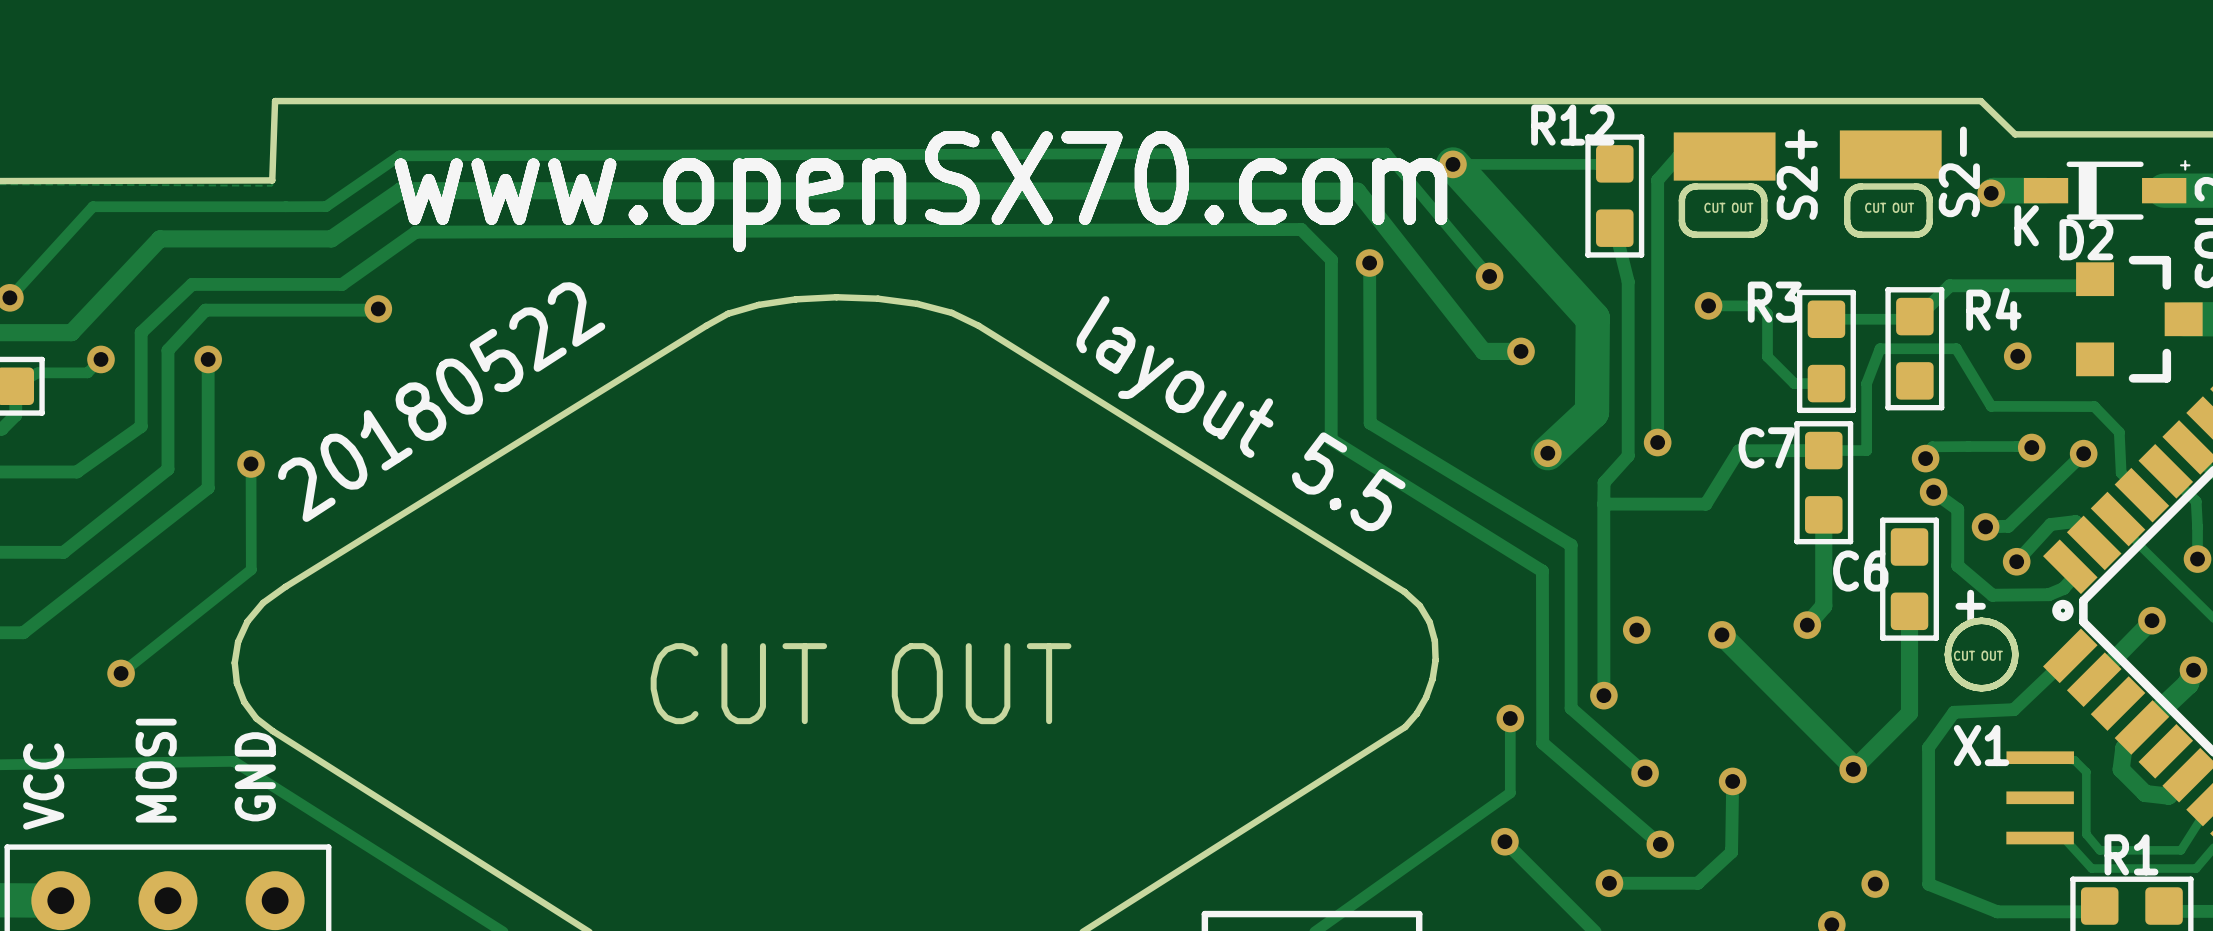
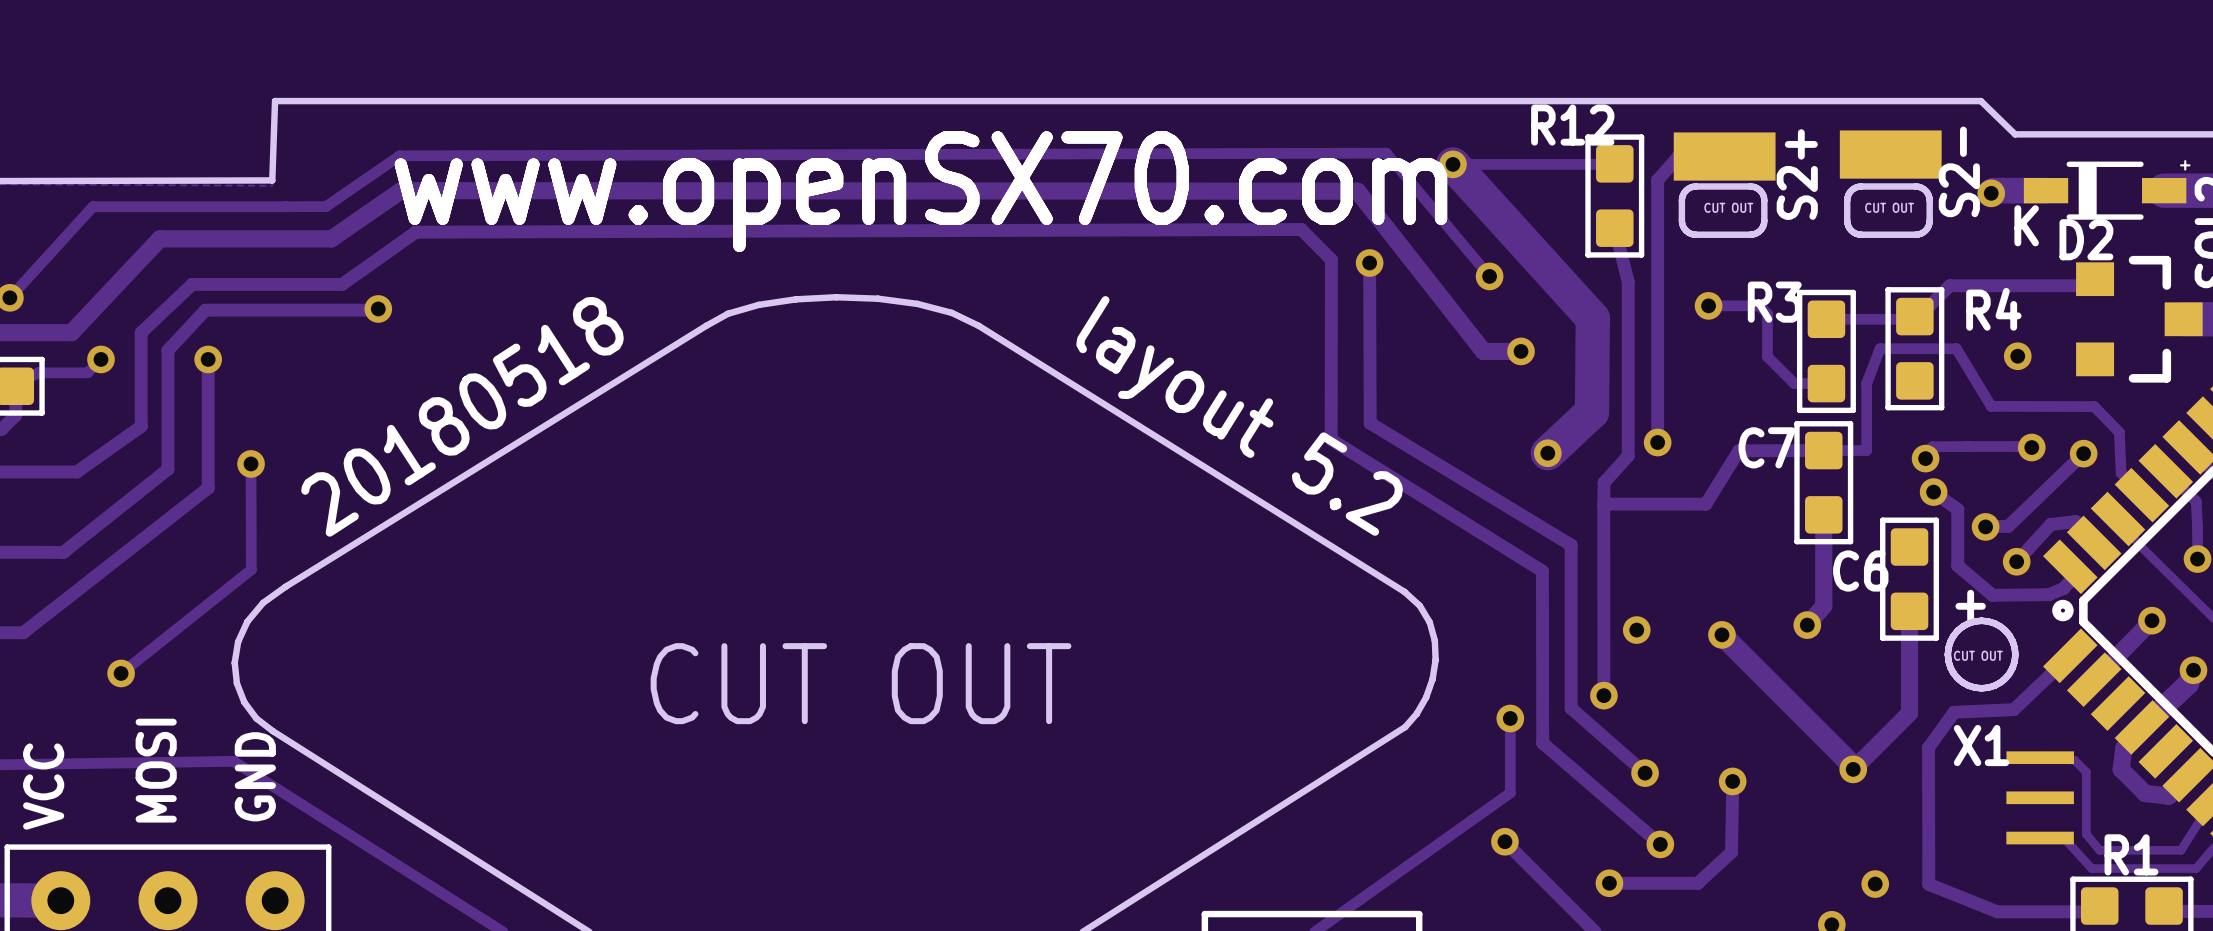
text: 20180522 (441, 402) -> 20180518 (462, 416)
text: layout 5.5 (1240, 413) -> layout 5.2 (1239, 415)

